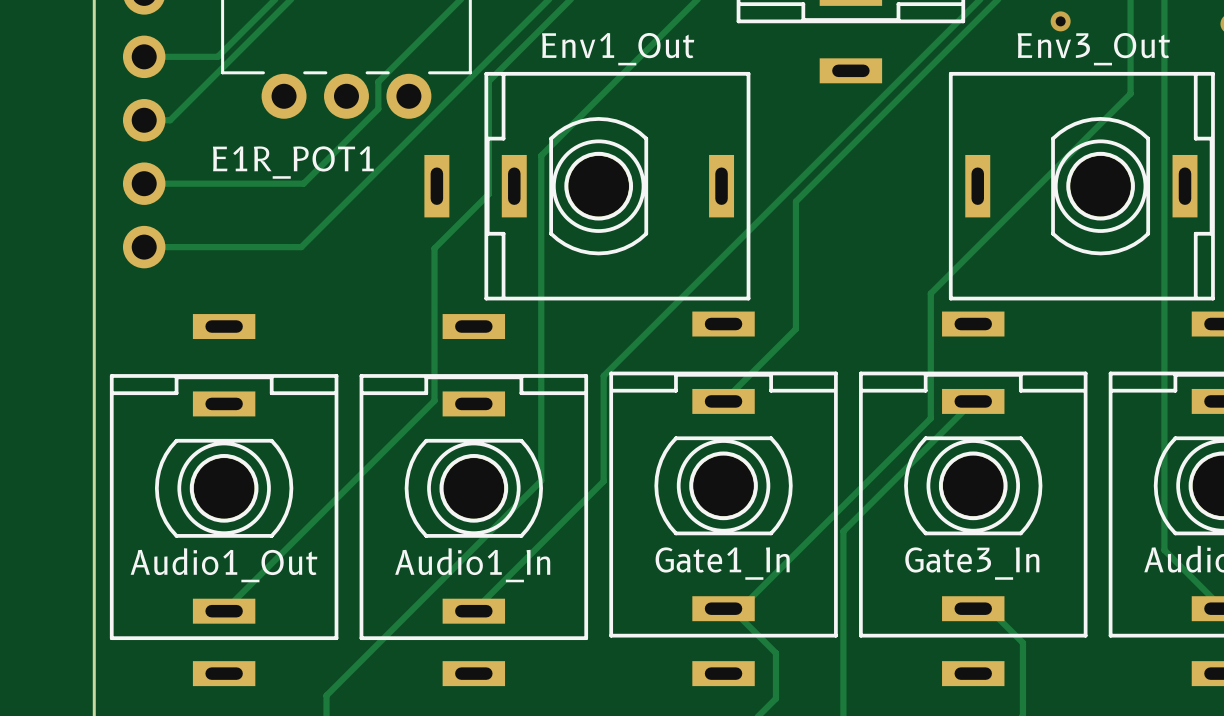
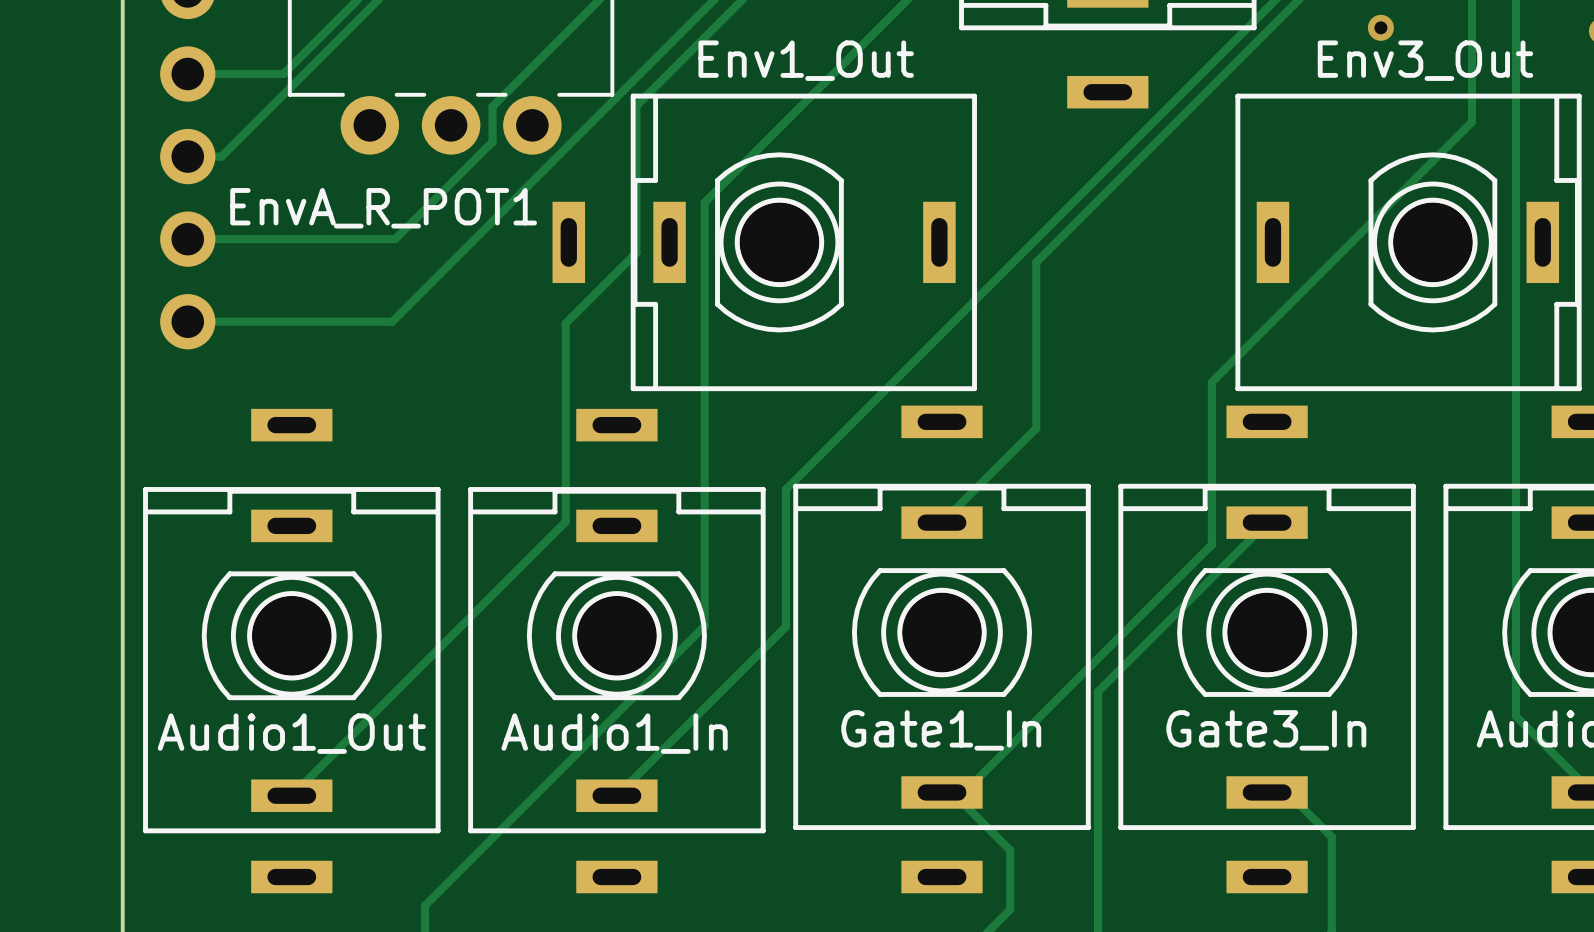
E1R_POT1 name: E1R_POT1 (293, 162) -> EnvA_R_POT1 (383, 208)

